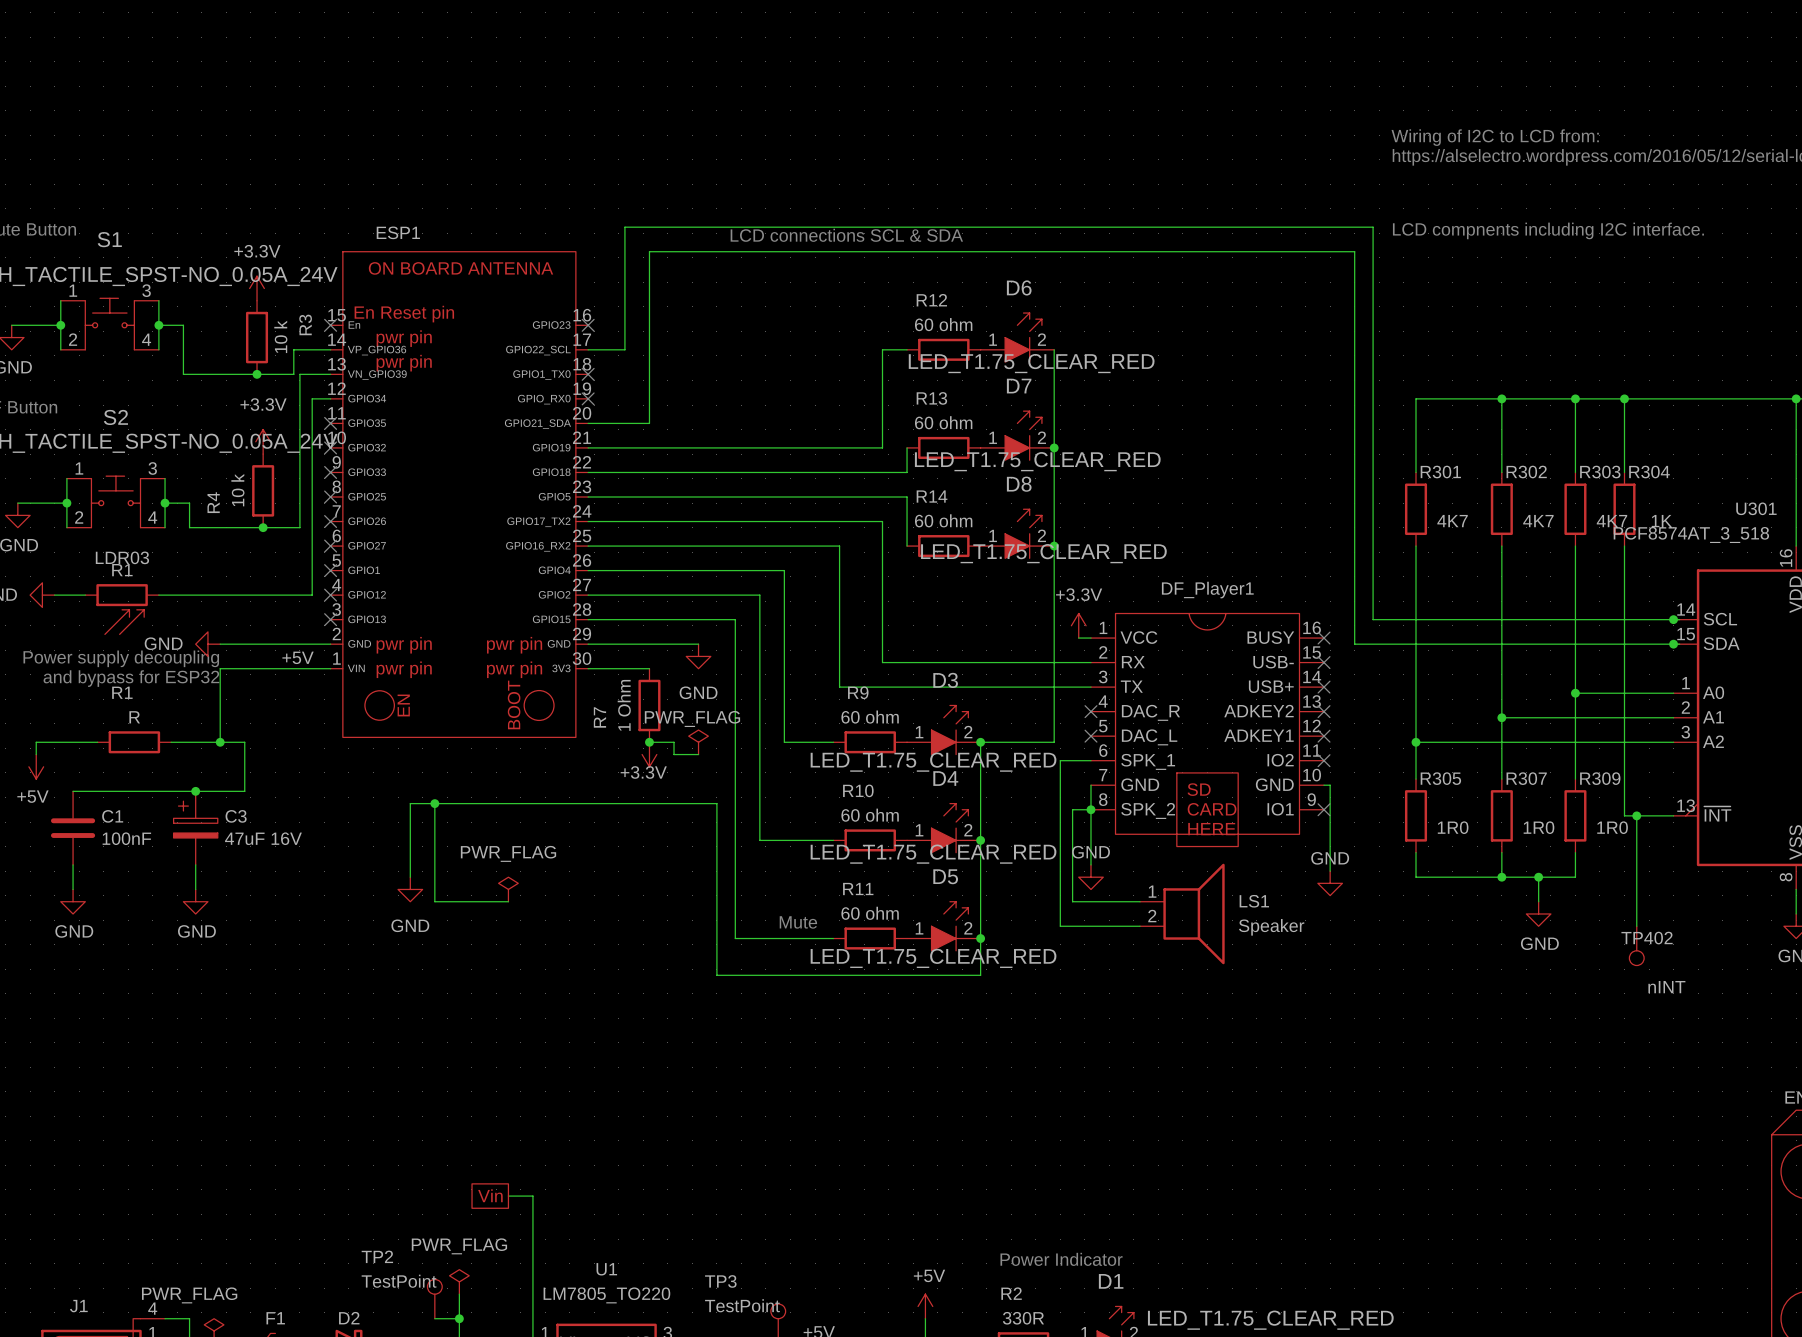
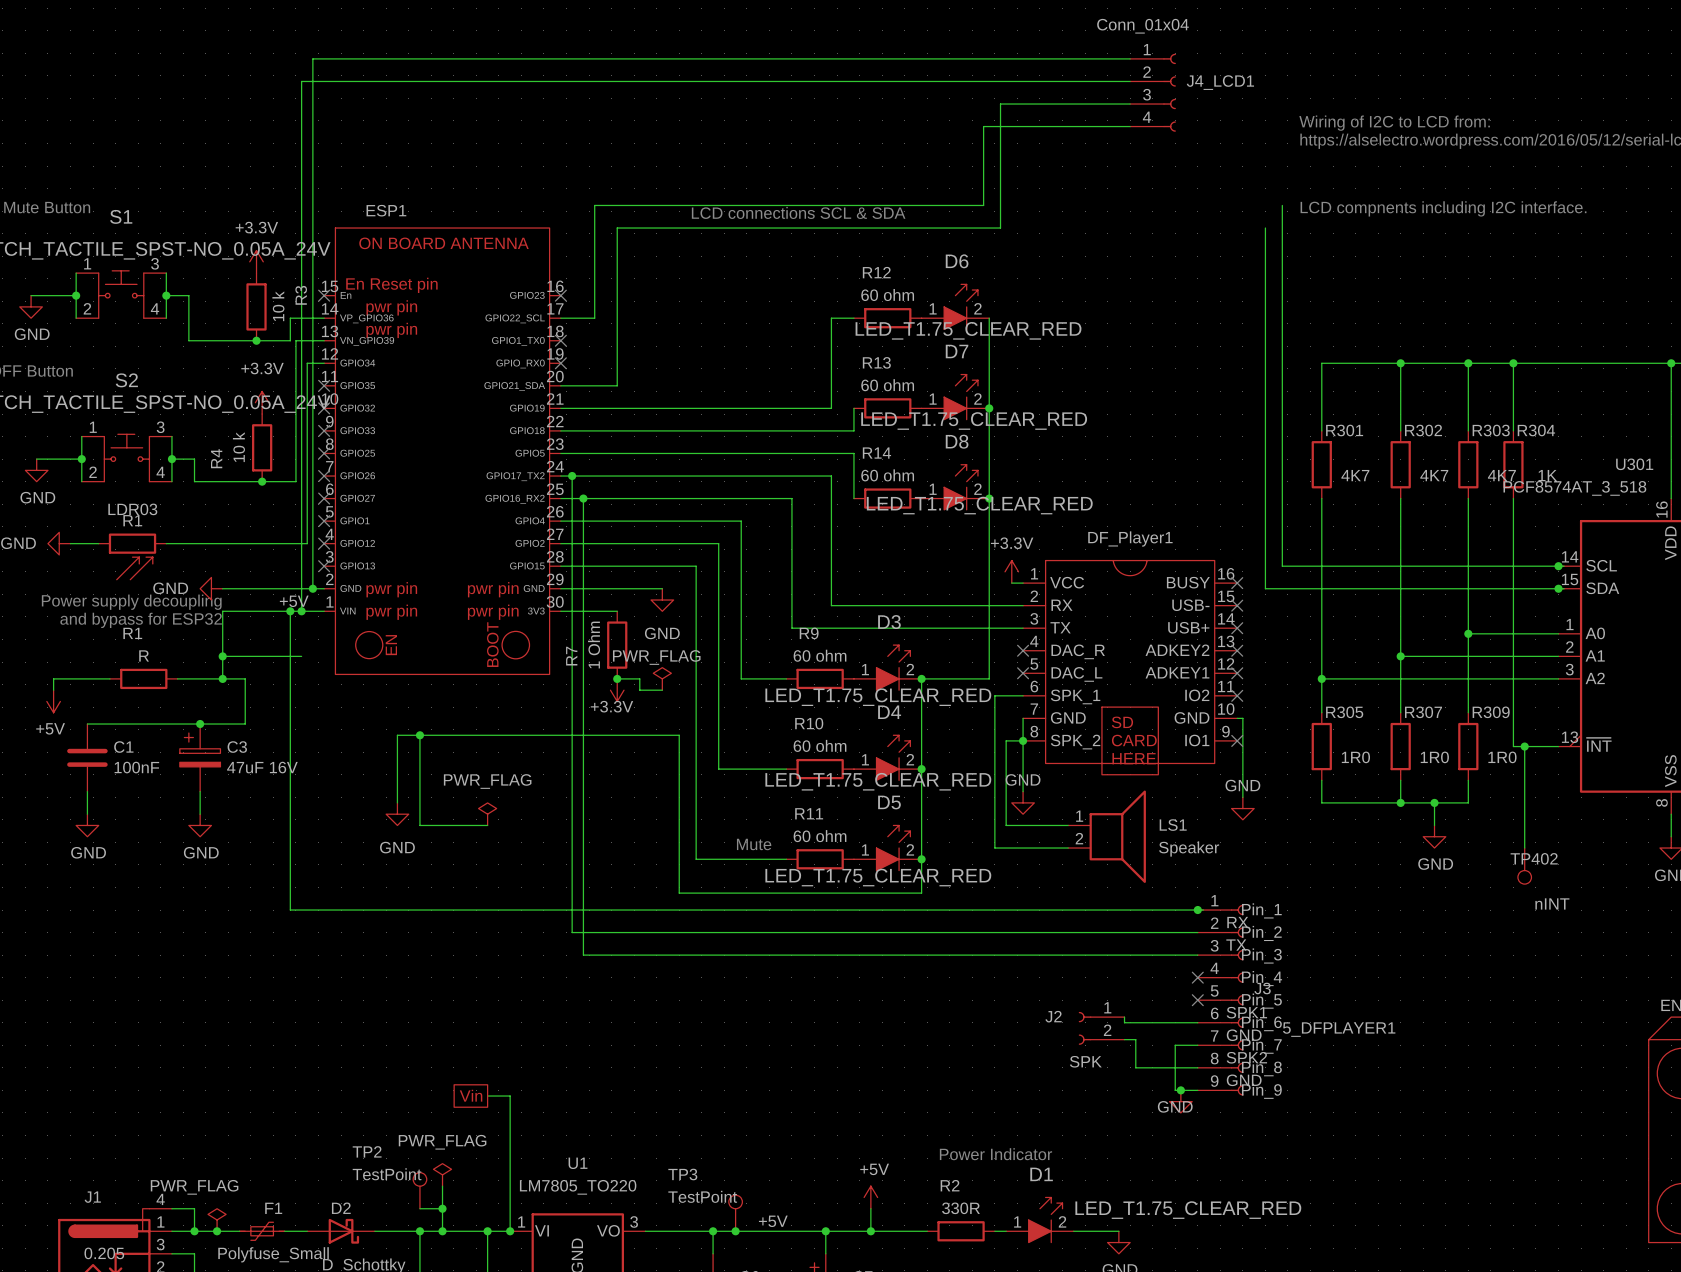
wire: none -> (1130, 58) (312, 58) (312, 588)
wire: none -> (1130, 81) (301, 81) (301, 611)
J4_LCD1: none -> Conn_01x04 (1153, 92)
wire: (1048, 227) (1373, 227) -> (983, 205) (983, 126) (1130, 126)
wire: (1066, 251) (1354, 251) -> (1000, 228) (1000, 104) (1130, 104)
wire: none -> (572, 476) (572, 932) (1197, 932)
junction: none -> (572, 476)
wire: none -> (583, 498) (583, 955) (1197, 955)
junction: none -> (583, 498)
junction: none -> (312, 588)
wire: none -> (290, 611) (290, 910) (1203, 910)
junction: none -> (290, 611)
junction: none -> (301, 611)
wire: none -> (222, 656) (301, 656)
junction: none -> (222, 656)
junction: none -> (1197, 910)
label: none -> RX (1237, 922)
label: none -> TX (1236, 945)
no-connect mark: none -> (1197, 977)
no-connect mark: none -> (1197, 1000)
J3: none -> 5_DFPLAYER1 (1220, 1000)
label: none -> SPK1 (1246, 1012)
wire: none -> (1124, 1017) (1124, 1022) (1197, 1022)
J2: none -> SPK (1101, 1028)
label: none -> GND (1244, 1035)
wire: none -> (1124, 1039) (1135, 1039) (1135, 1067) (1197, 1067)
wire: none -> (1197, 1045) (1175, 1045) (1175, 1090) (1197, 1090)
label: none -> SPK2 (1246, 1057)
label: none -> GND (1244, 1080)
junction: none -> (1180, 1090)
power symbol: none -> GND (1180, 1101)

